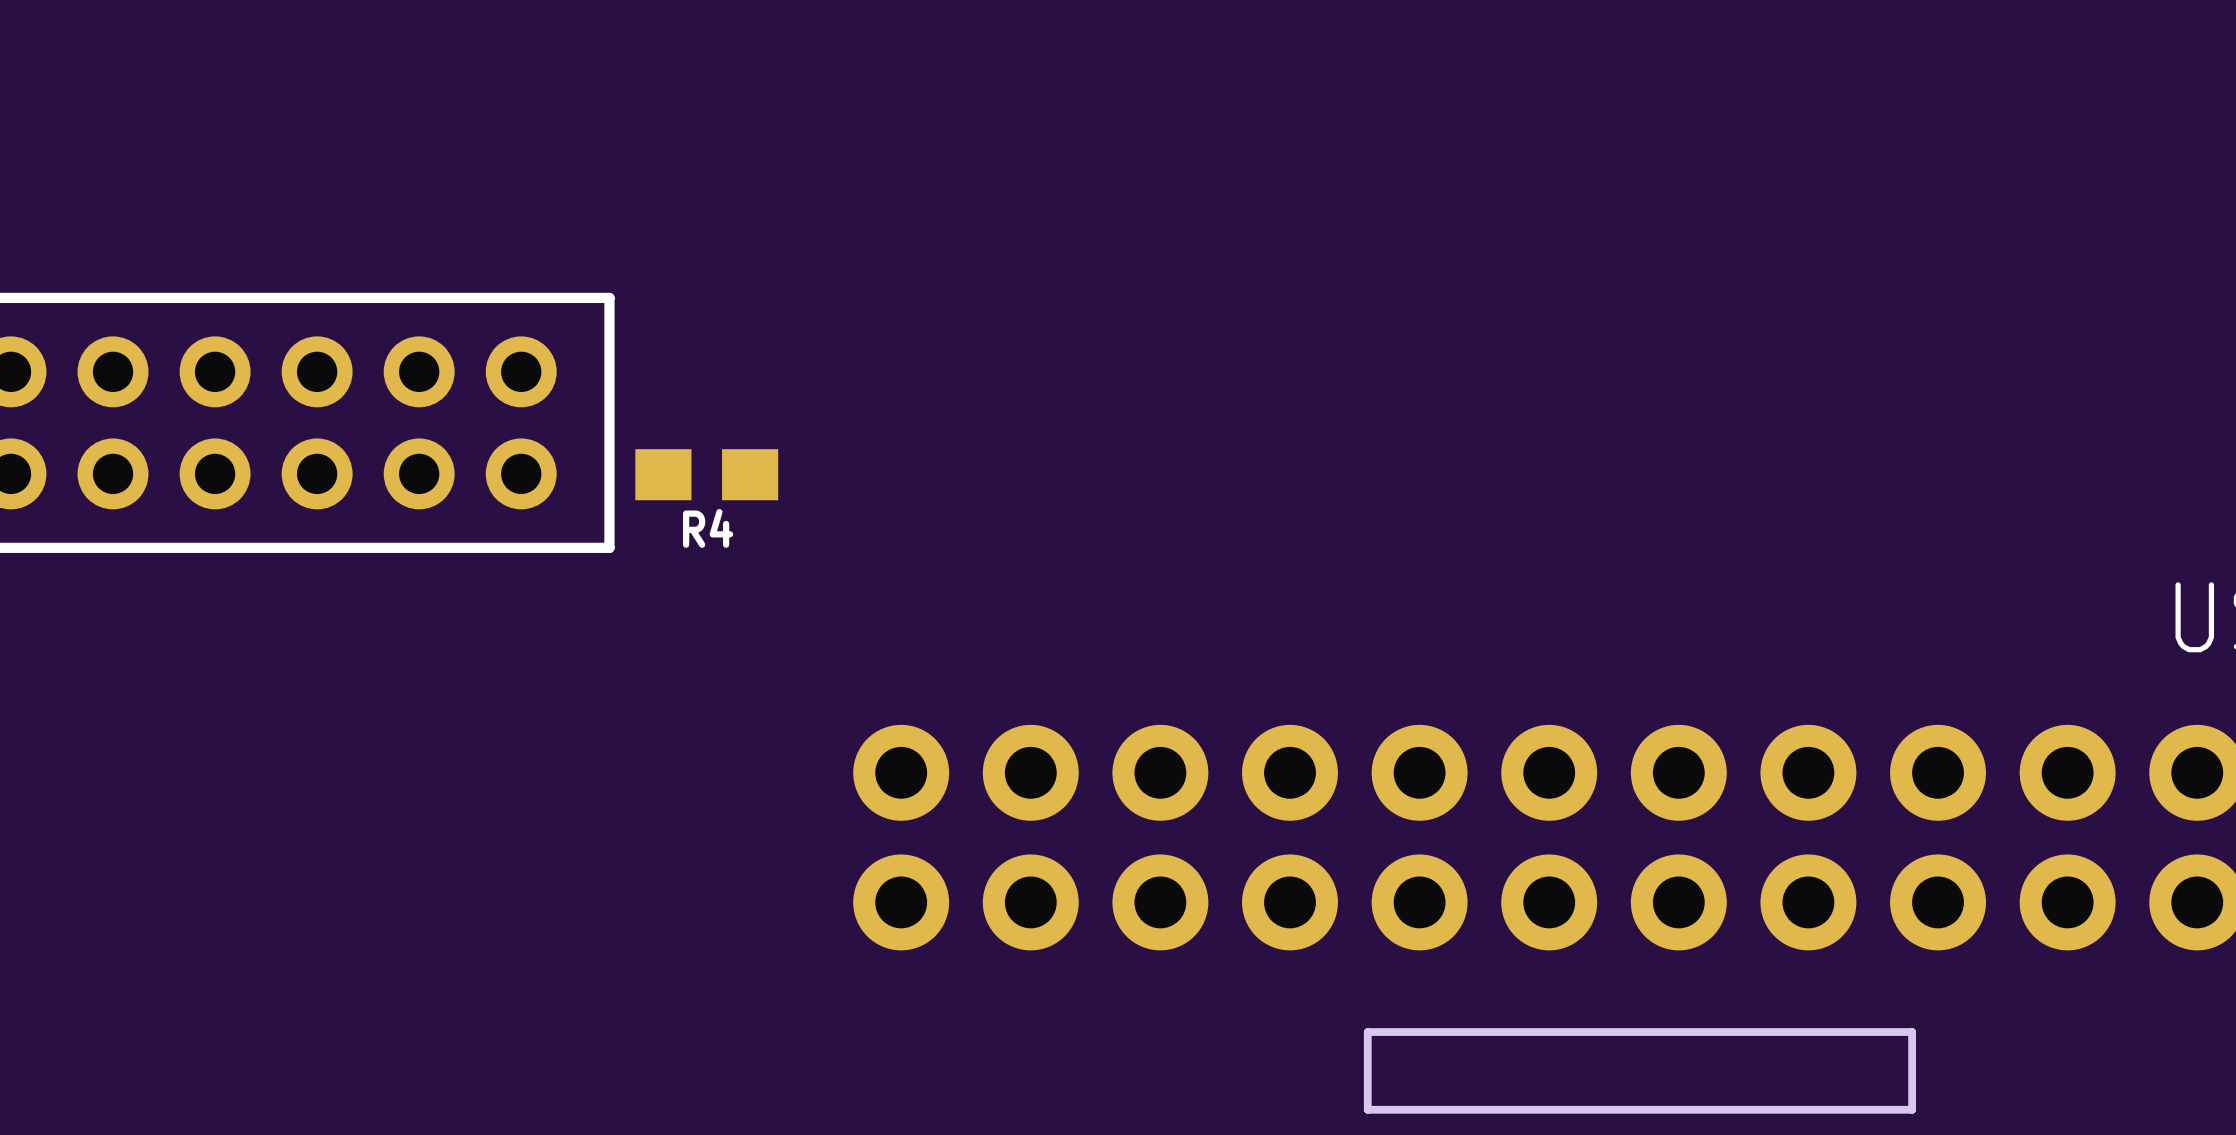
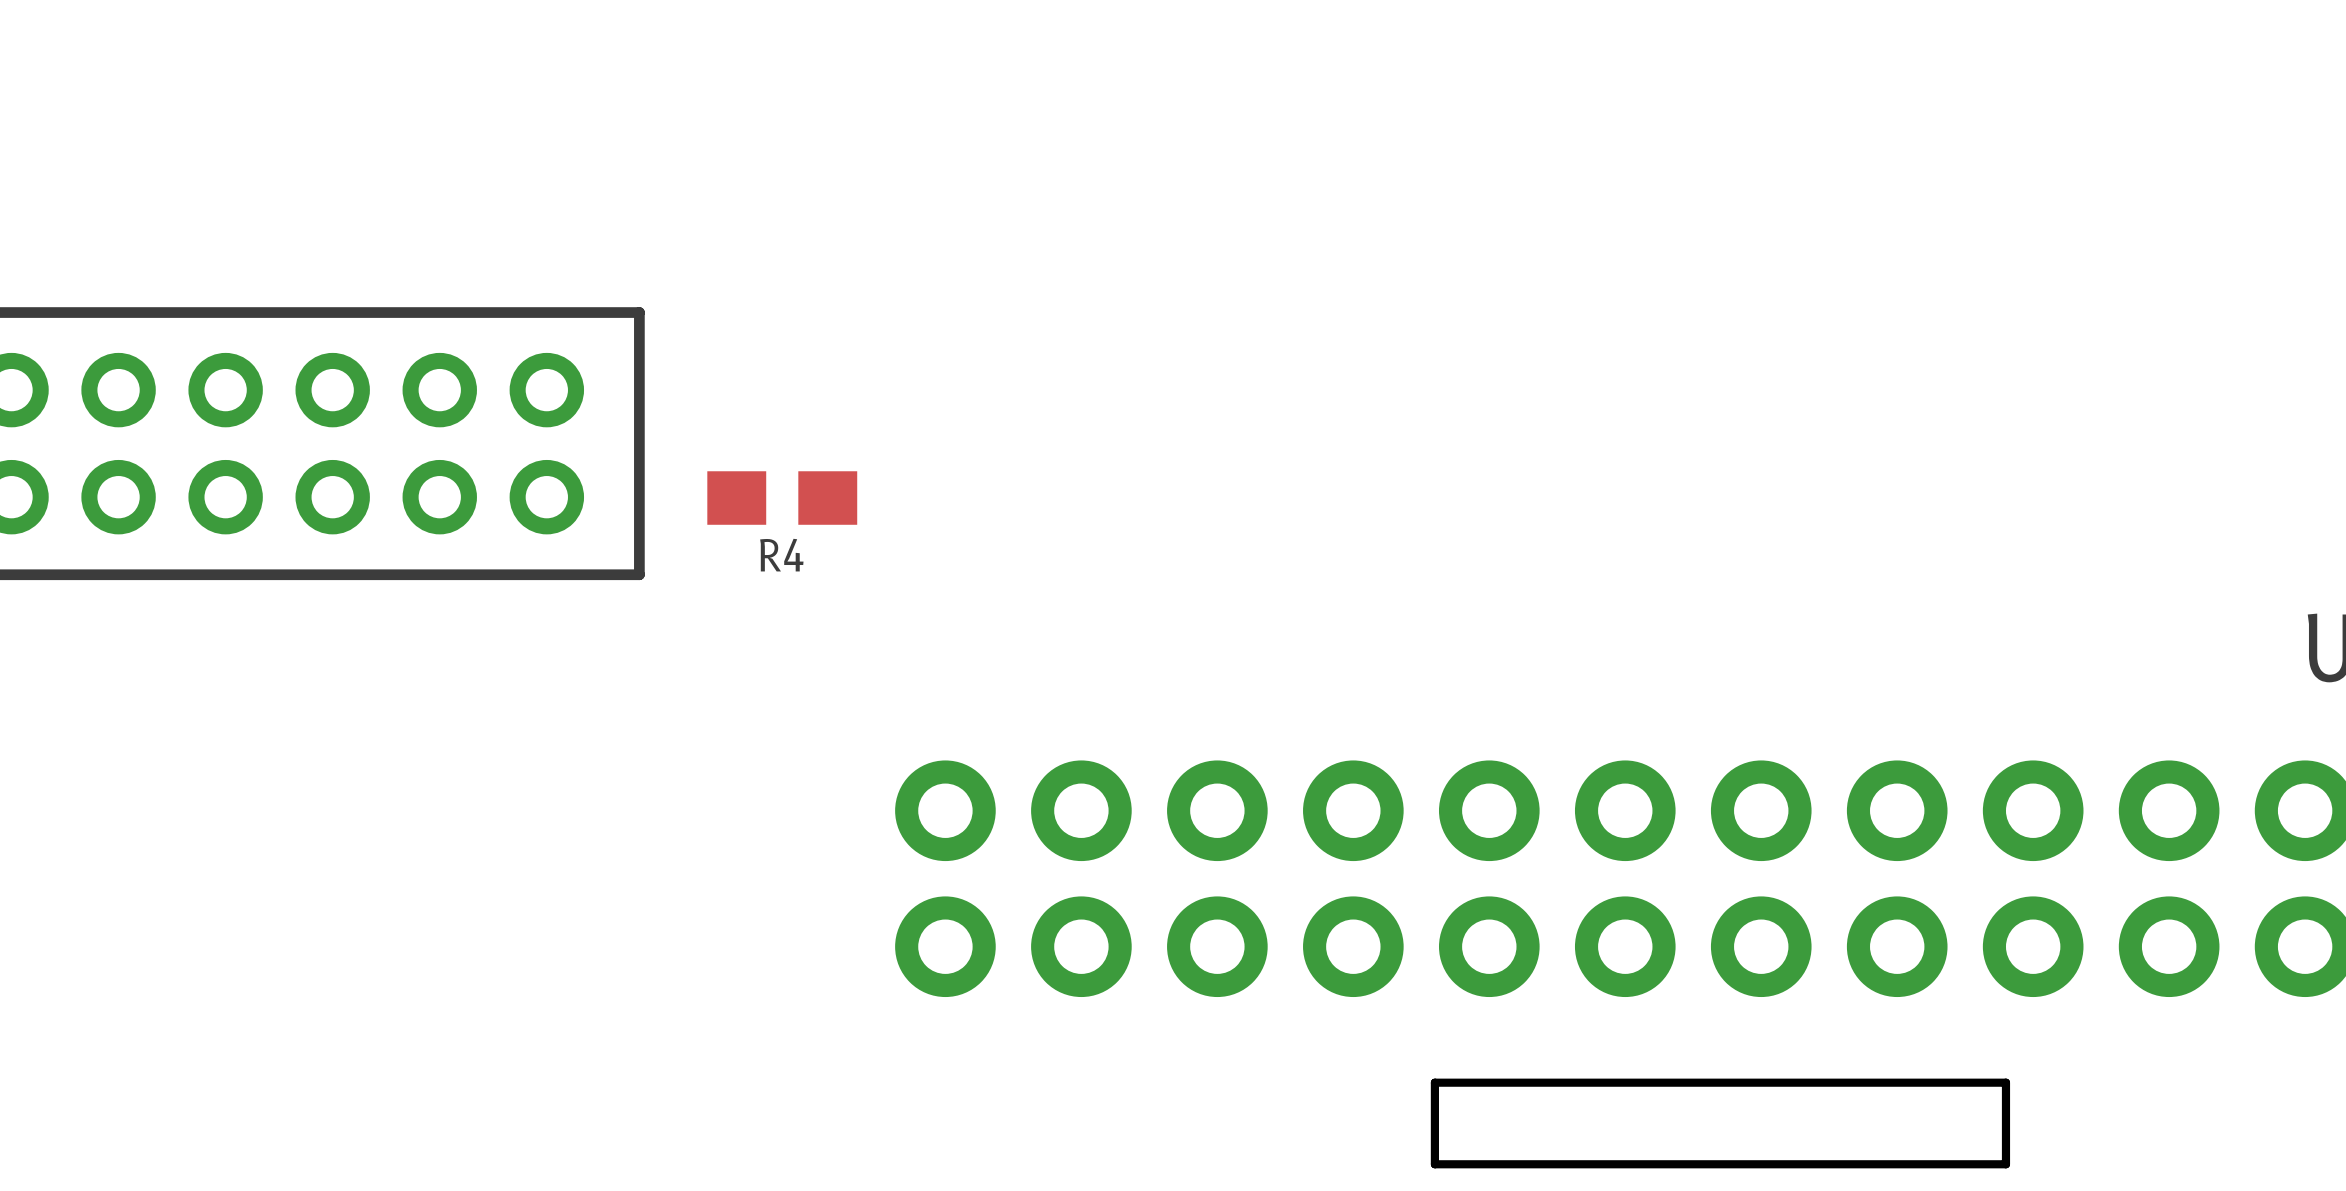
R4 position: (706, 474) -> (782, 498)

